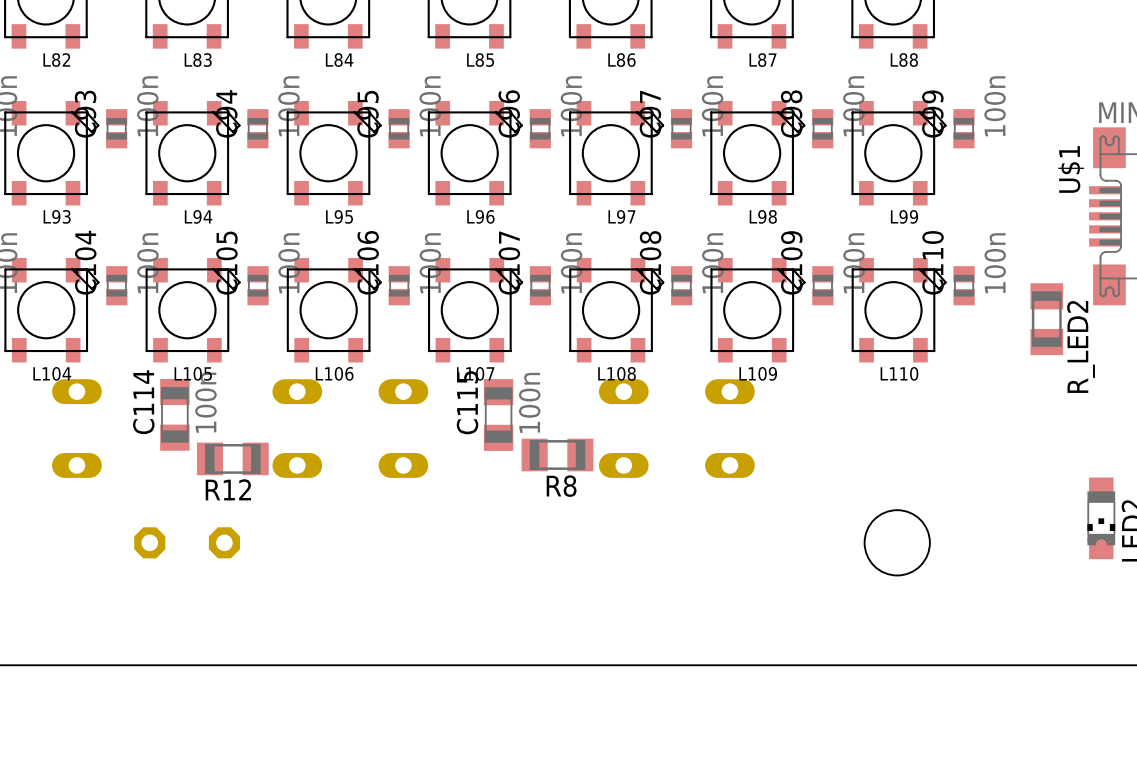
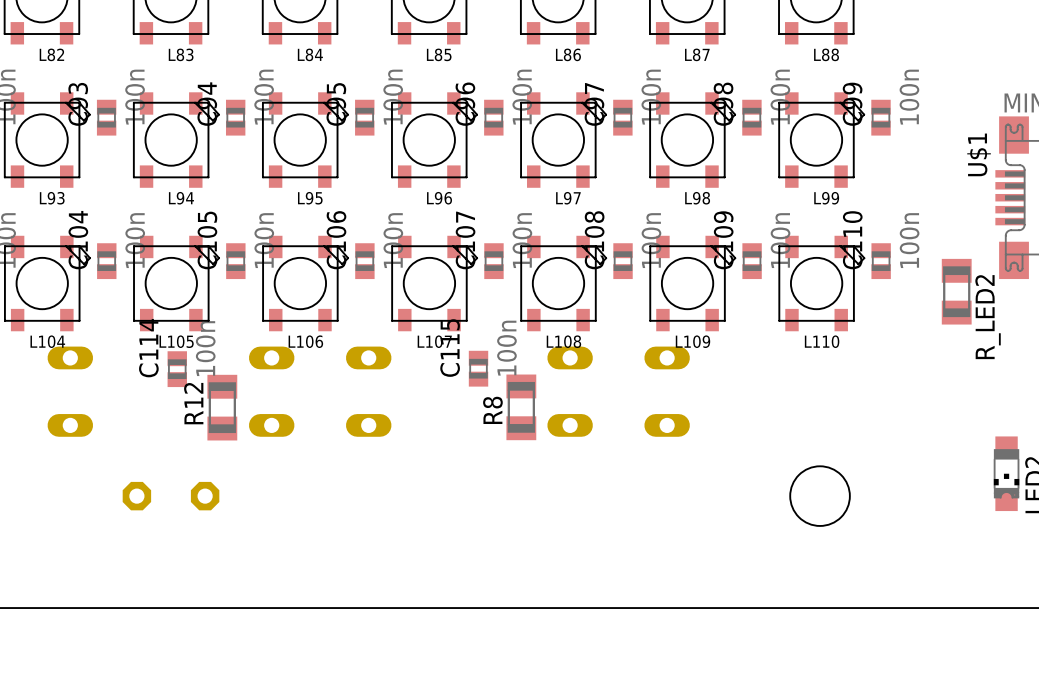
C114 footprint: [160, 378, 190, 451] -> [167, 351, 187, 388]
C115 footprint: [483, 379, 514, 451] -> [468, 350, 489, 387]
R8 rotation: 0° (557, 455) -> 90° clockwise (521, 407)
R12 rotation: 0° (232, 458) -> 90° clockwise (222, 407)

